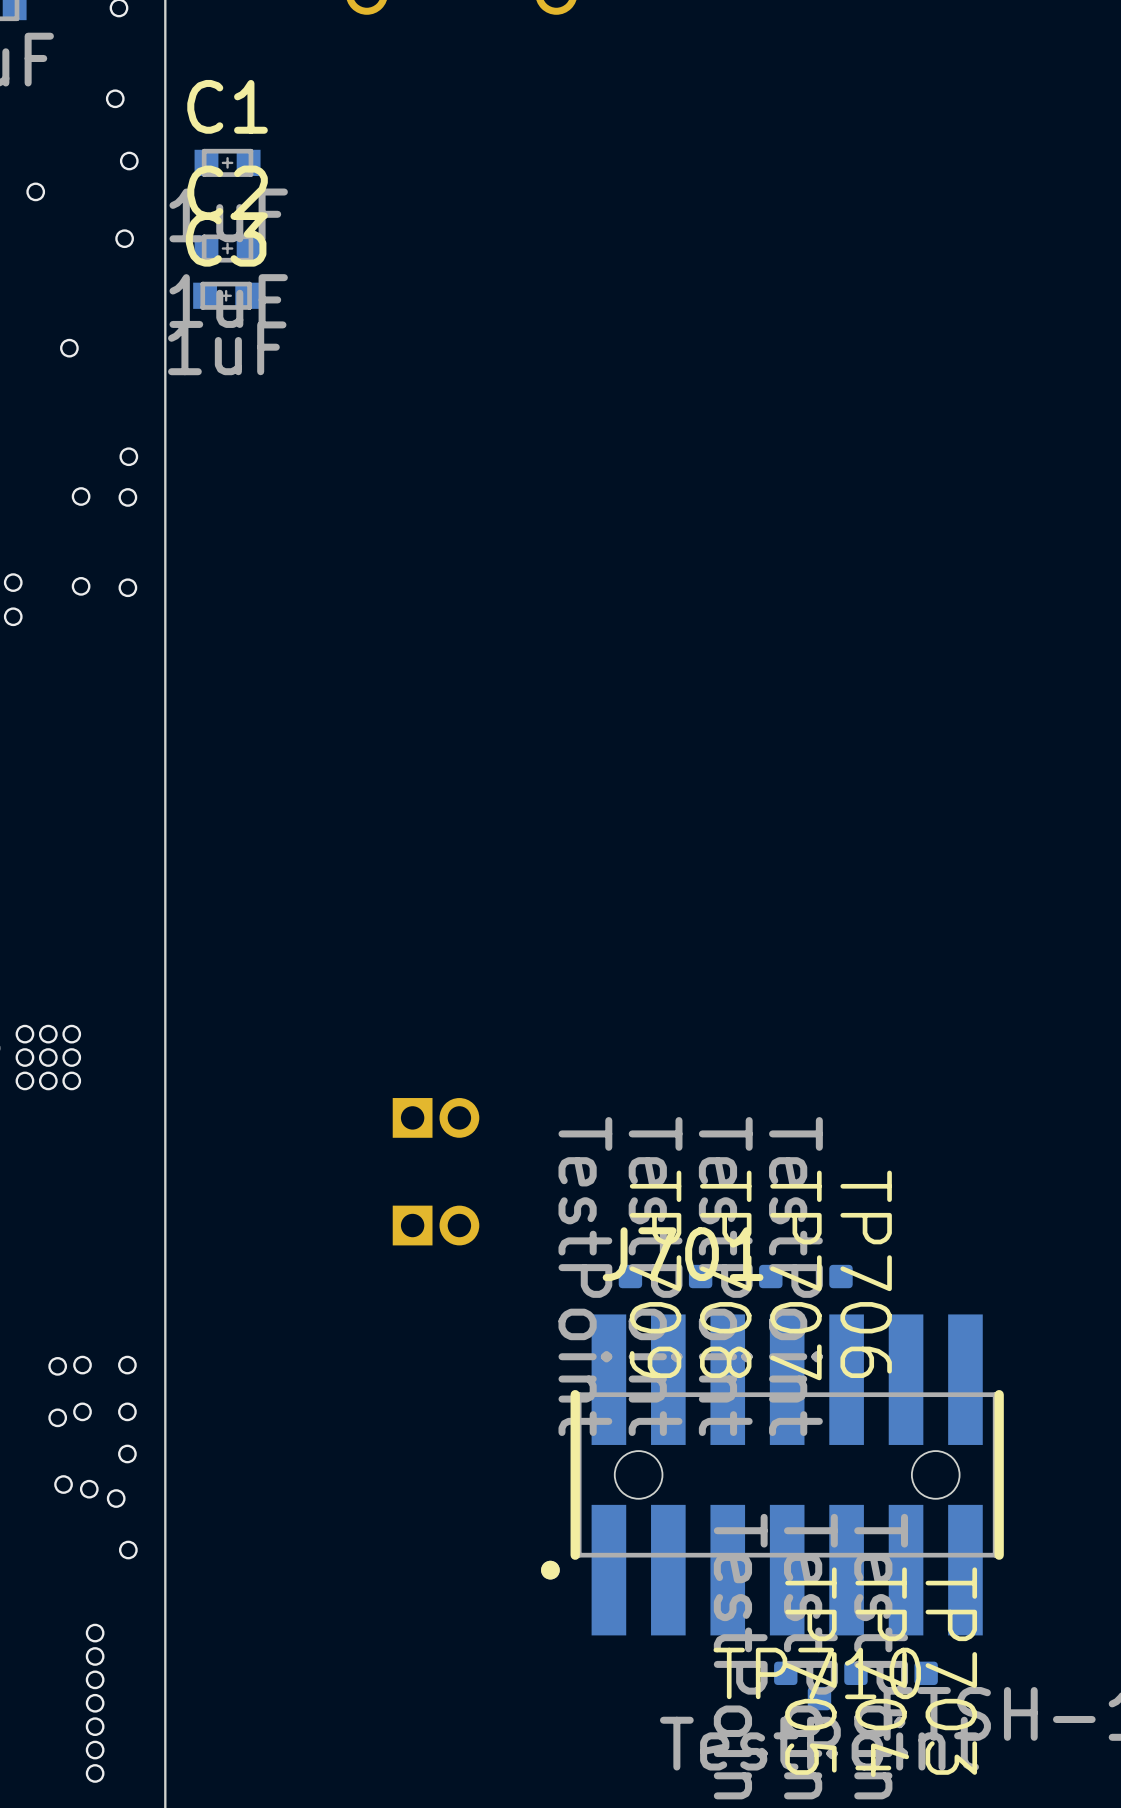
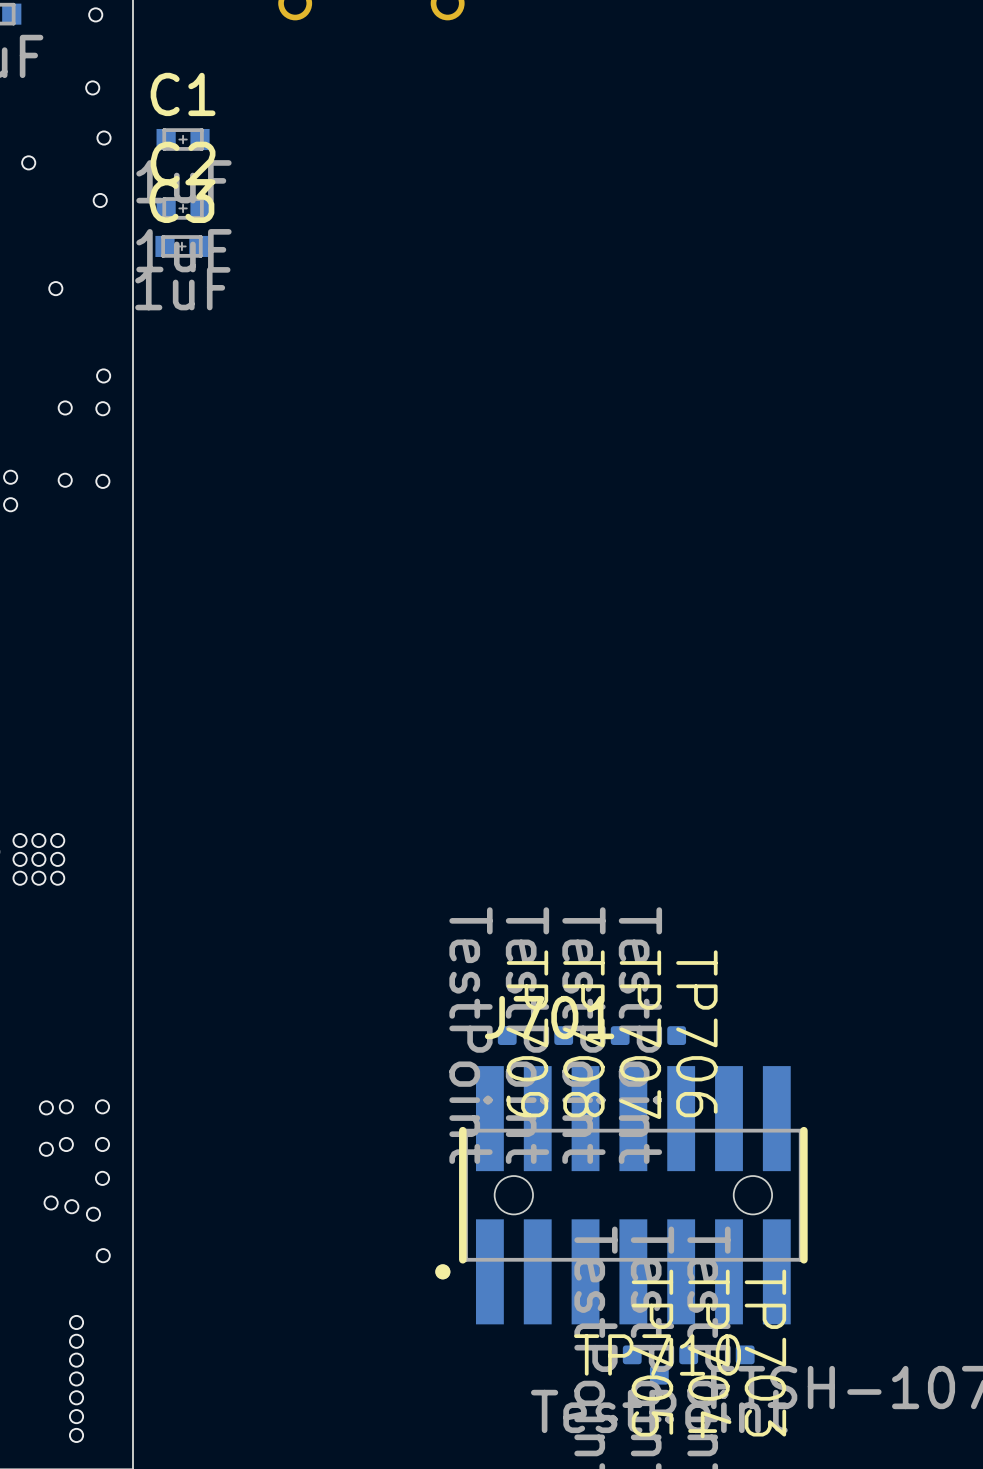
part: (436, 1117) -> none
part: (436, 1225) -> none

